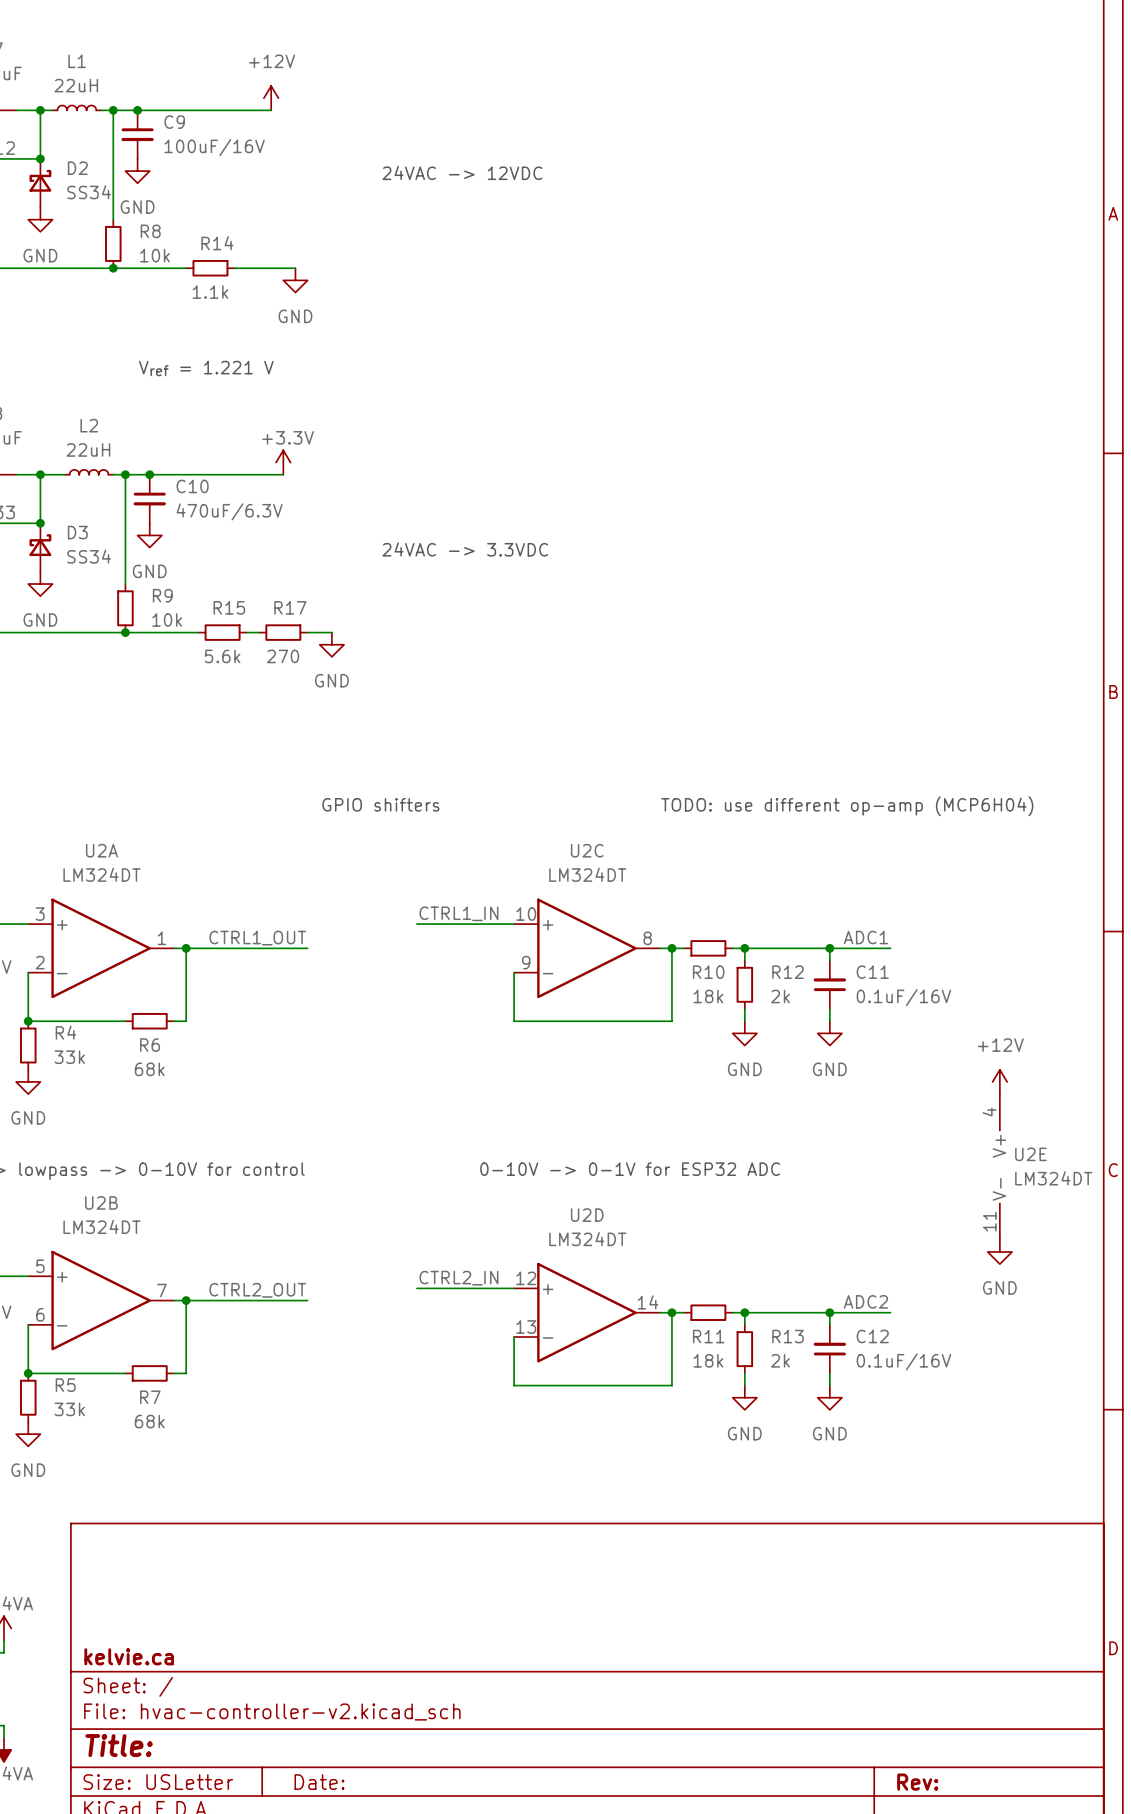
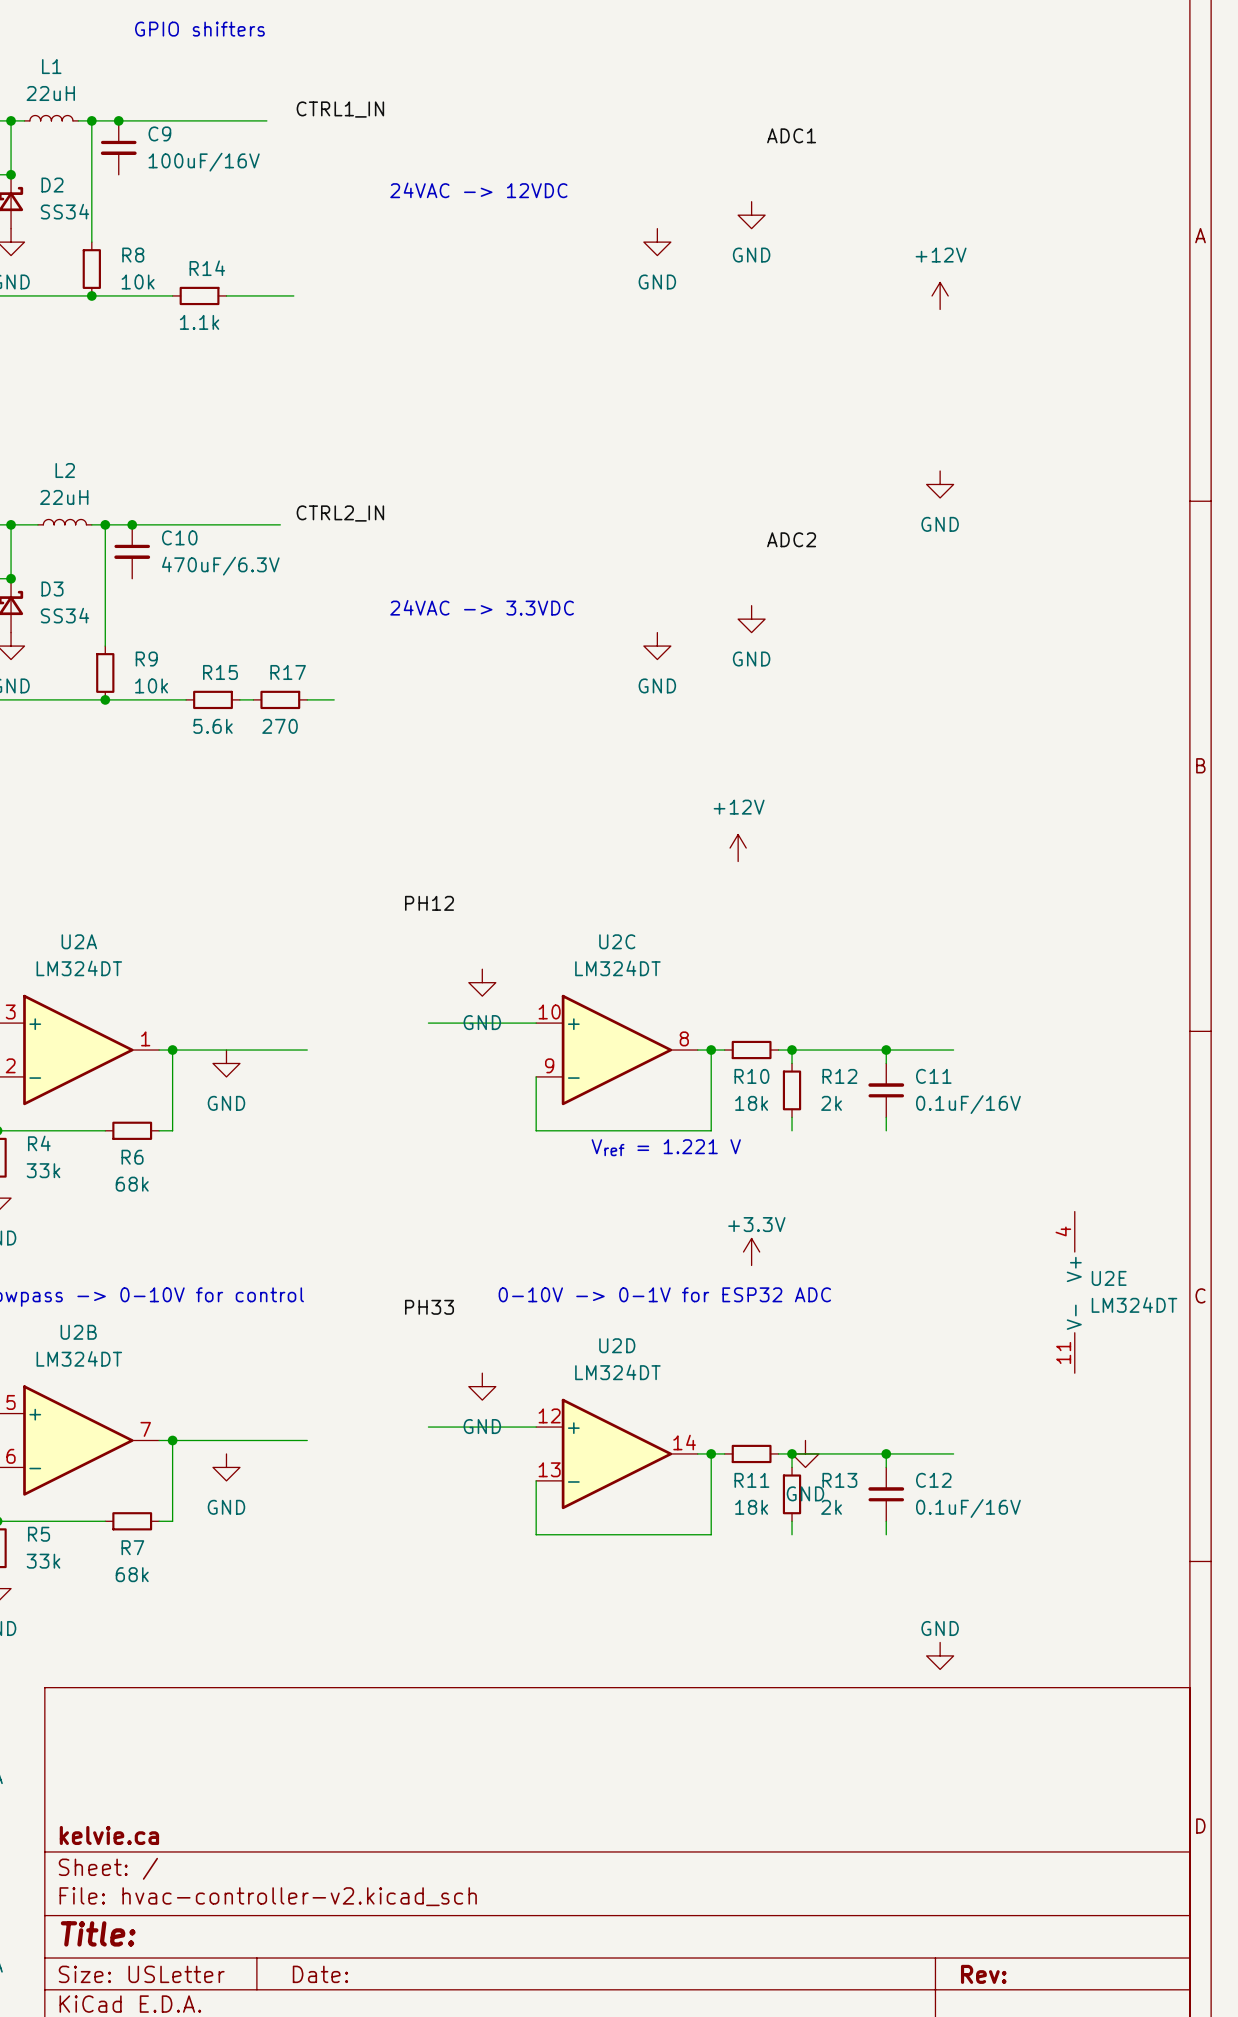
text: none -> GPIO shifters (199, 29)
power symbol: +12V (271, 98) -> none
label: none -> CTRL1_IN (340, 109)
label: none -> ADC1 (791, 135)
power symbol: GND (137, 171) -> none
power symbol: none -> GND (751, 215)
power symbol: none -> GND (657, 242)
power symbol: none -> +12V (940, 295)
power symbol: GND (295, 280) -> none
text: Vref = 1.221 V (206, 368) -> none
power symbol: none -> GND (940, 484)
power symbol: +3.3V (283, 462) -> none
label: none -> CTRL2_IN (340, 513)
label: none -> ADC2 (791, 539)
power symbol: GND (149, 535) -> none
power symbol: none -> GND (751, 619)
power symbol: none -> GND (657, 646)
power symbol: GND (331, 644) -> none
power symbol: none -> +12V (738, 848)
text: GPIO shifters (380, 804) -> none
text: TODO: use different op-amp (MCP6H04) (847, 806) -> none
label: none -> PH12 (429, 903)
power symbol: none -> GND (482, 982)
label: CTRL1_IN (458, 913) -> none
label: ADC1 (865, 937) -> none
label: CTRL1_OUT (257, 938) -> none
power symbol: none -> GND (226, 1063)
power symbol: GND (744, 1033) -> none
power symbol: GND (829, 1033) -> none
text: none -> Vref = 1.221 V (666, 1147)
power symbol: +12V (999, 1081) -> none
power symbol: none -> +3.3V (751, 1251)
label: none -> PH33 (429, 1307)
power symbol: none -> GND (482, 1386)
power symbol: GND (999, 1251) -> none
label: CTRL2_IN (458, 1278) -> none
label: CTRL2_OUT (257, 1290) -> none
label: ADC2 (865, 1301) -> none
power symbol: none -> GND (805, 1453)
power symbol: none -> GND (226, 1467)
power symbol: GND (744, 1397) -> none
power symbol: GND (829, 1397) -> none
power symbol: none -> GND (940, 1655)

